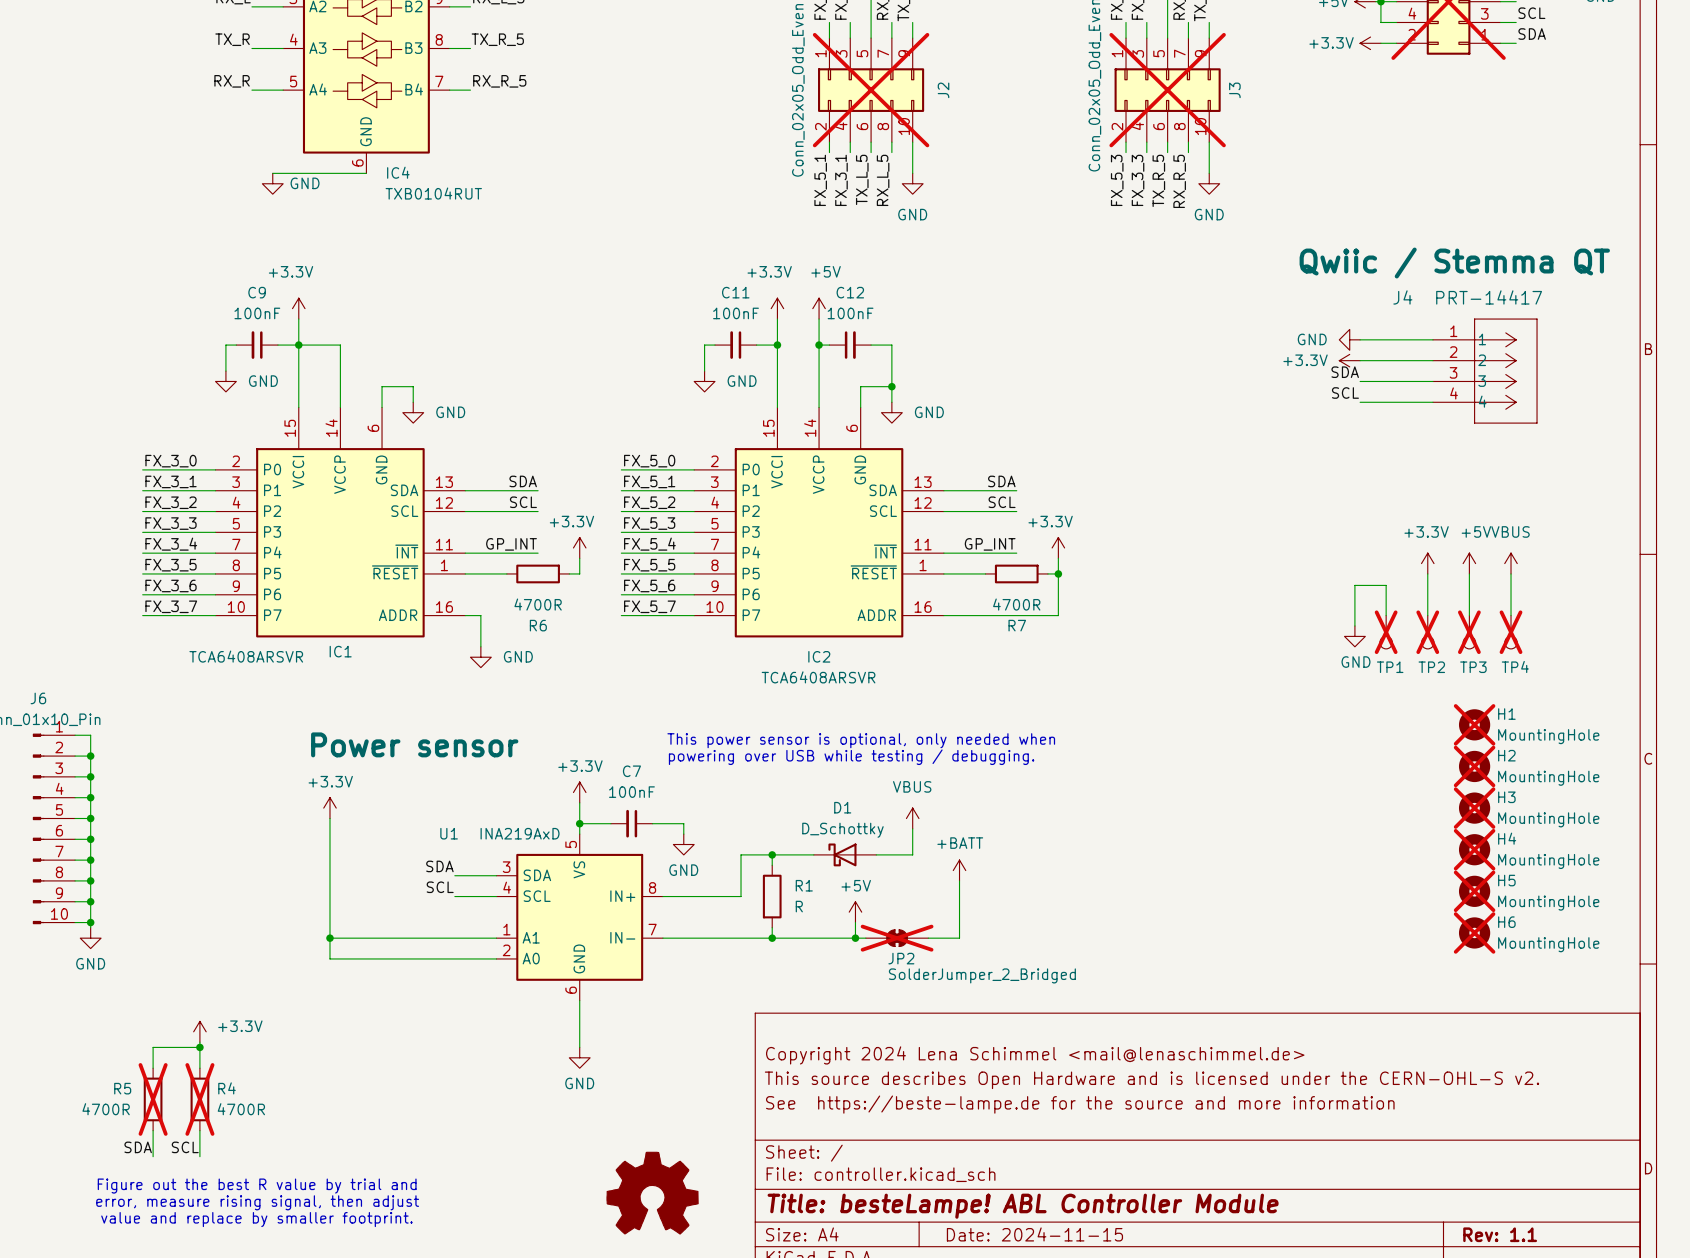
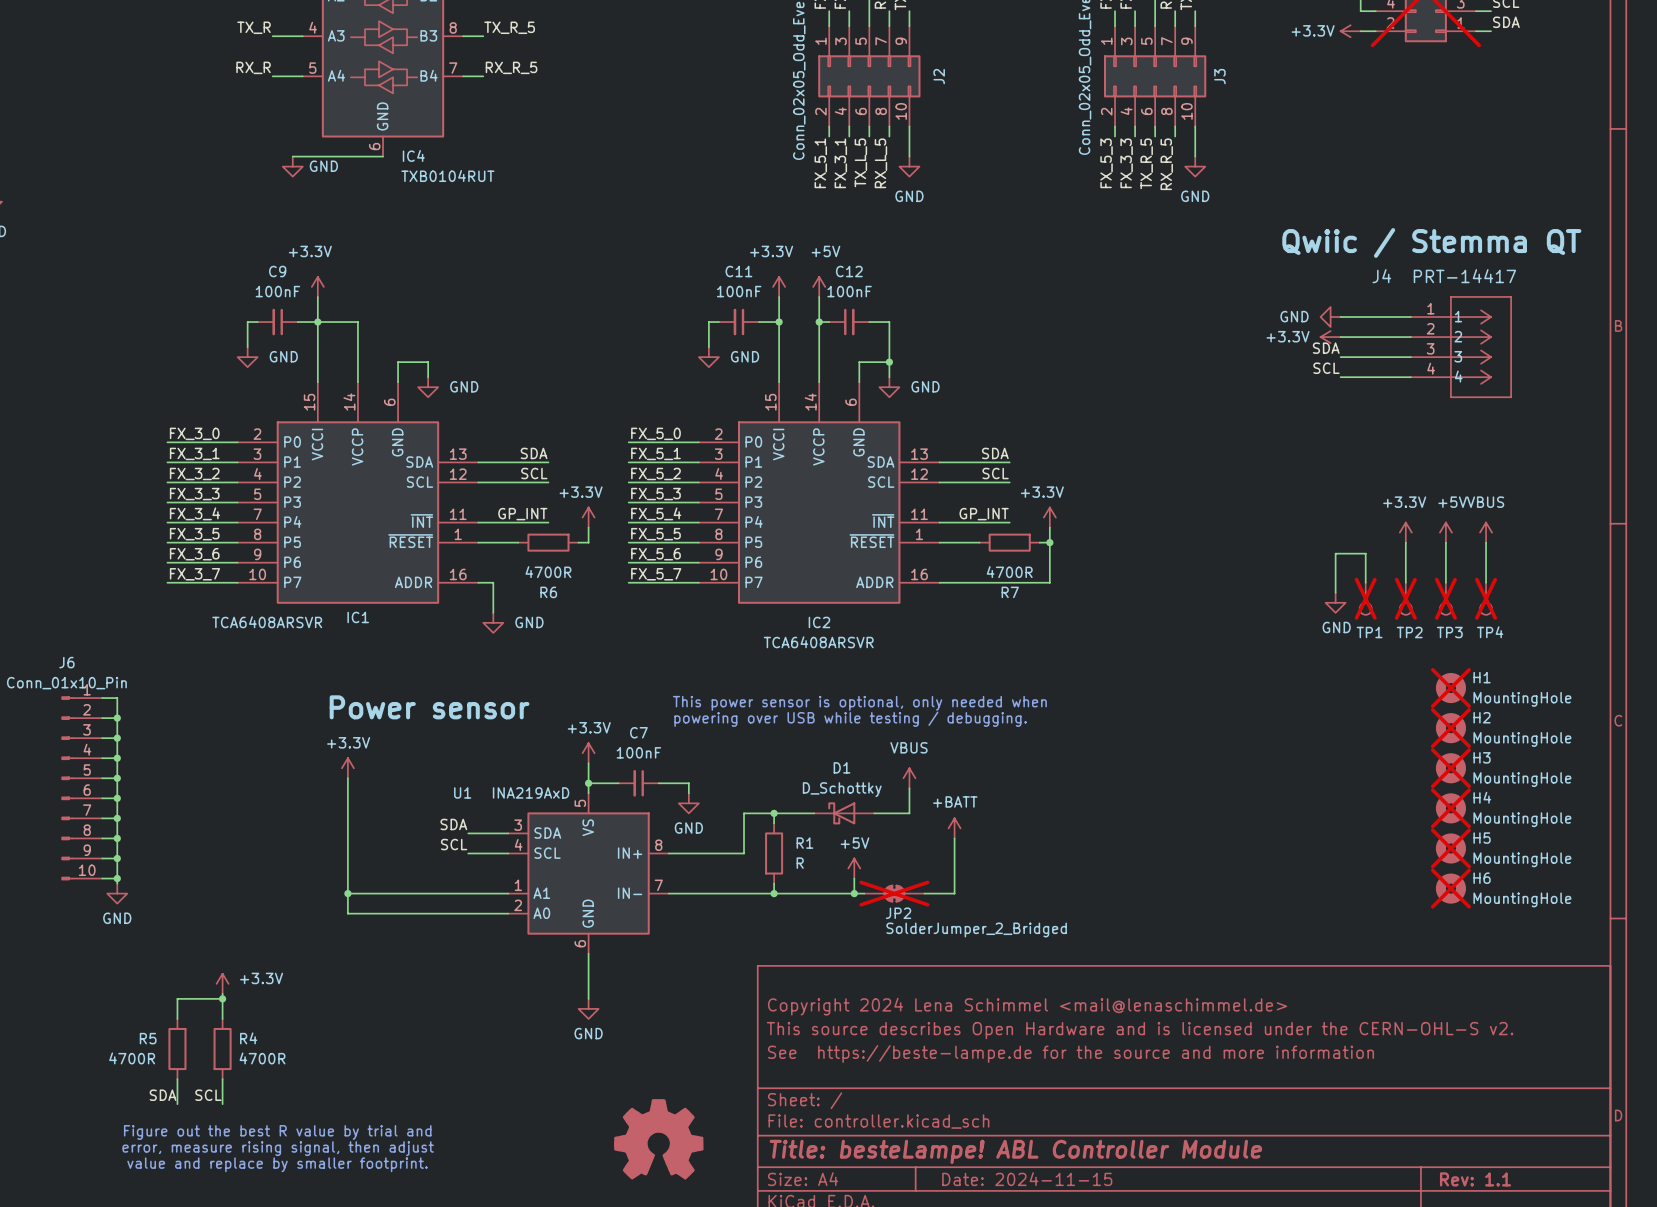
J2 do-not-place cross: (871, 90) -> none
J3 do-not-place cross: (1167, 90) -> none
R5 do-not-place cross: (153, 1099) -> none
R4 do-not-place cross: (199, 1099) -> none

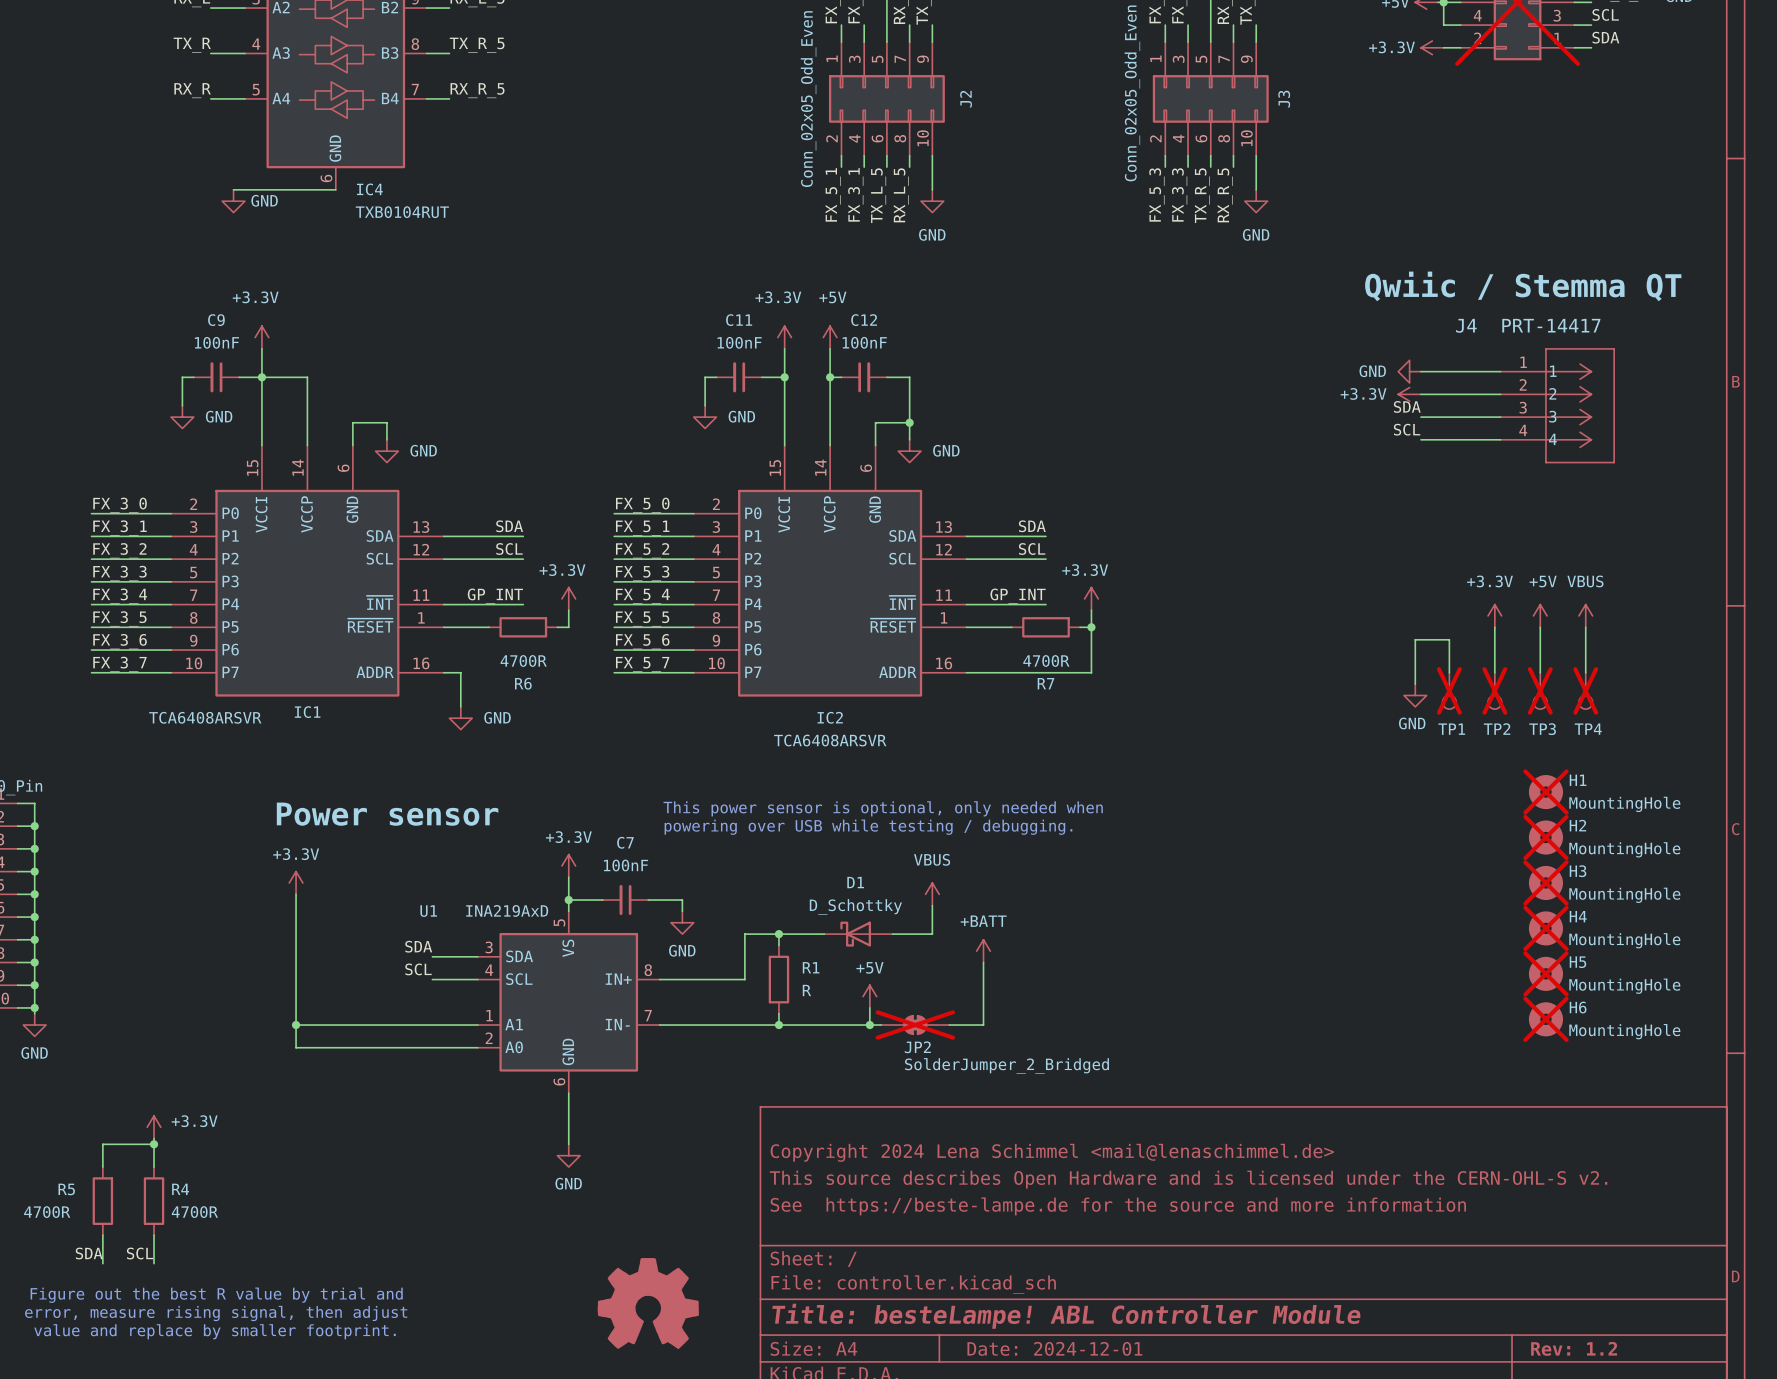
title block: Date: 2024-11-15 (1027, 1179) -> Date: 2024-12-01 (1054, 1348)
title block: Rev: 1.1 (1475, 1179) -> Rev: 1.2 (1574, 1348)

